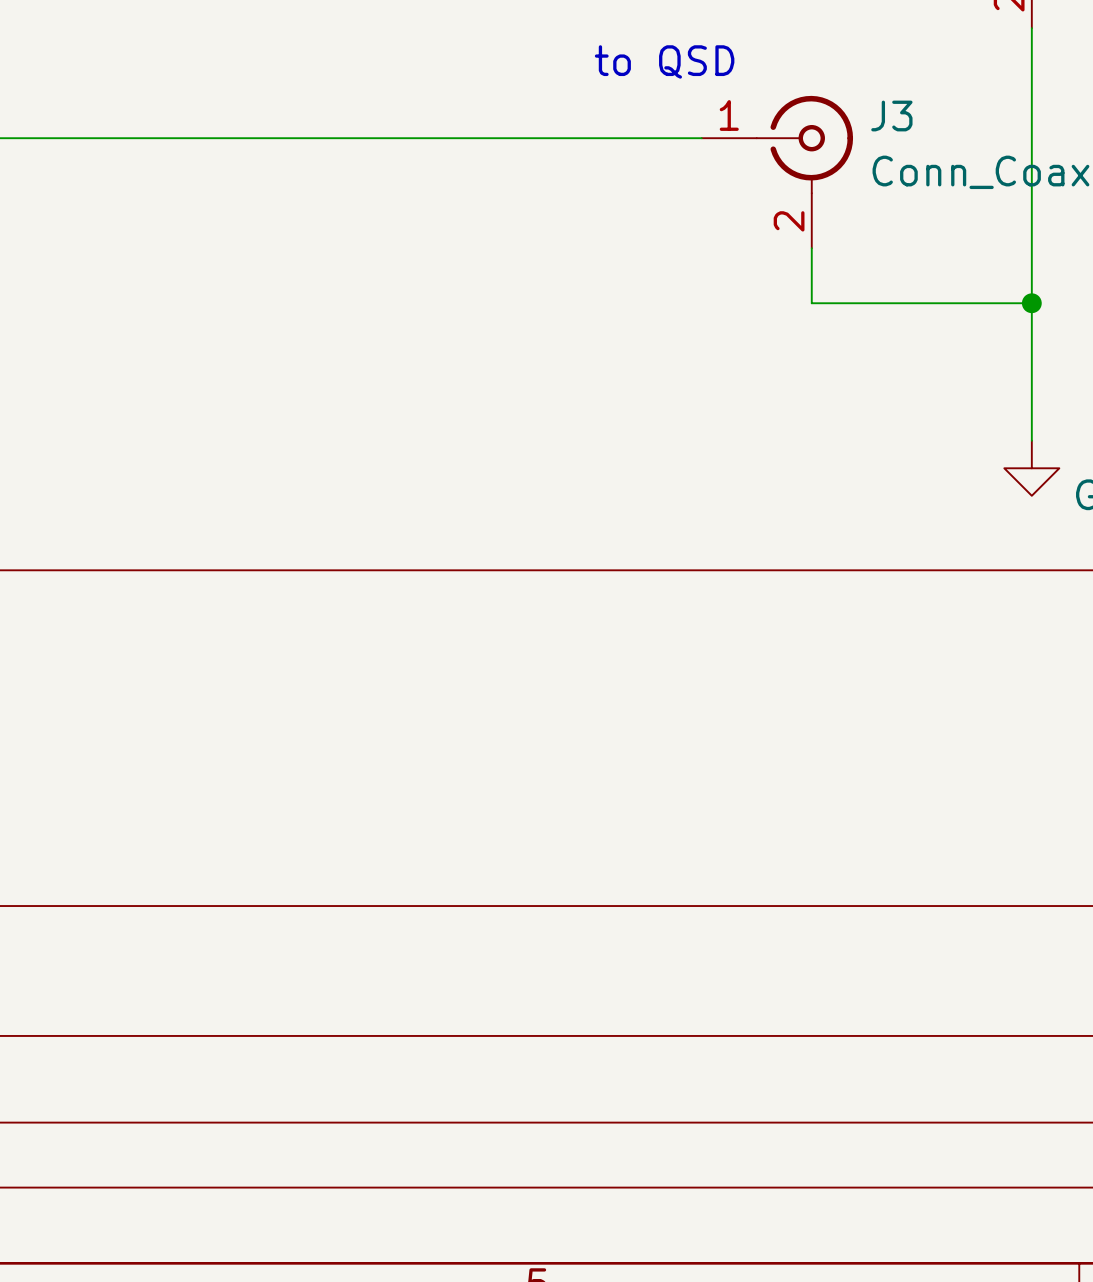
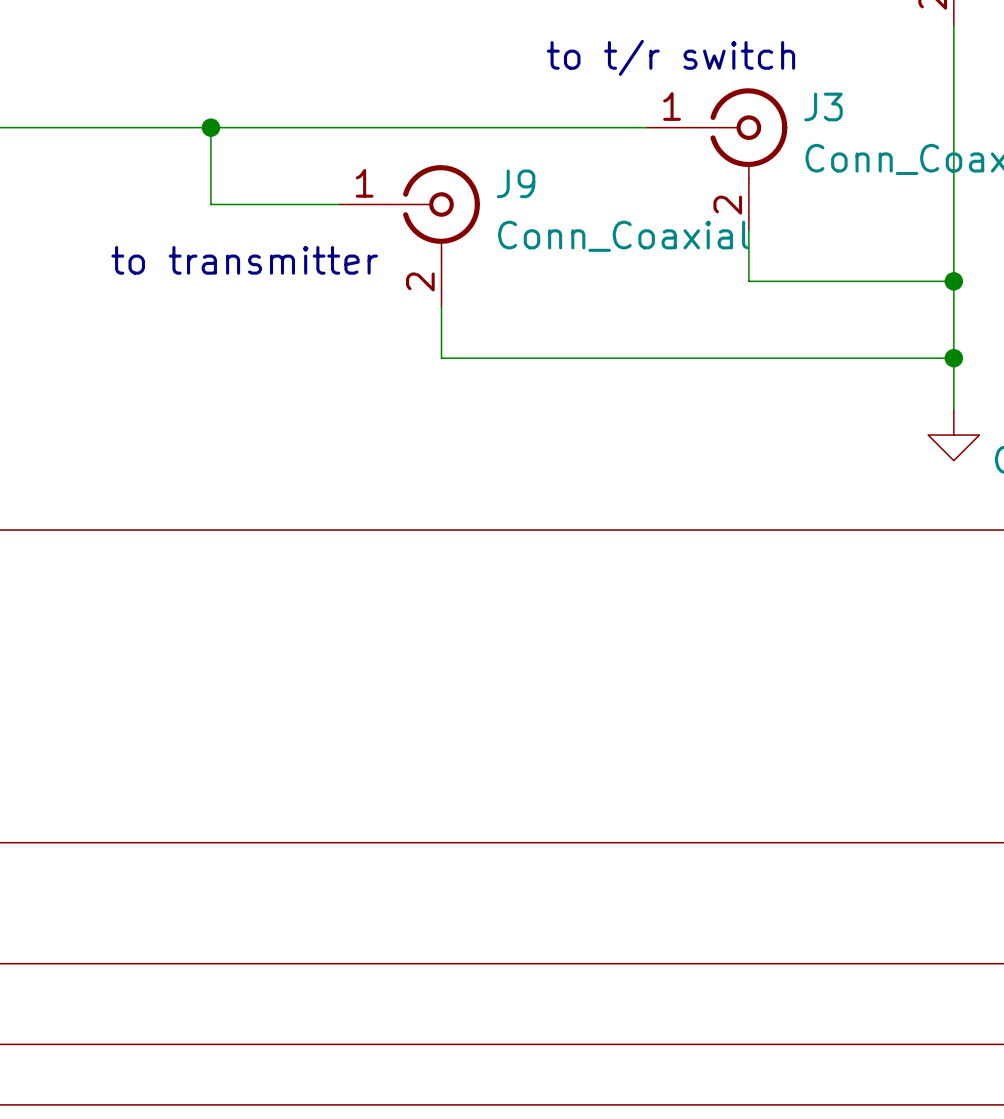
text: to QSD (664, 61) -> to t/r switch (671, 57)
wire: none -> (210, 127) (210, 204) (339, 204)
junction: none -> (210, 127)
J9: none -> Conn_Coaxial (409, 236)
text: none -> to transmitter (244, 260)
wire: none -> (441, 306) (441, 358) (953, 358)
junction: none -> (953, 358)

